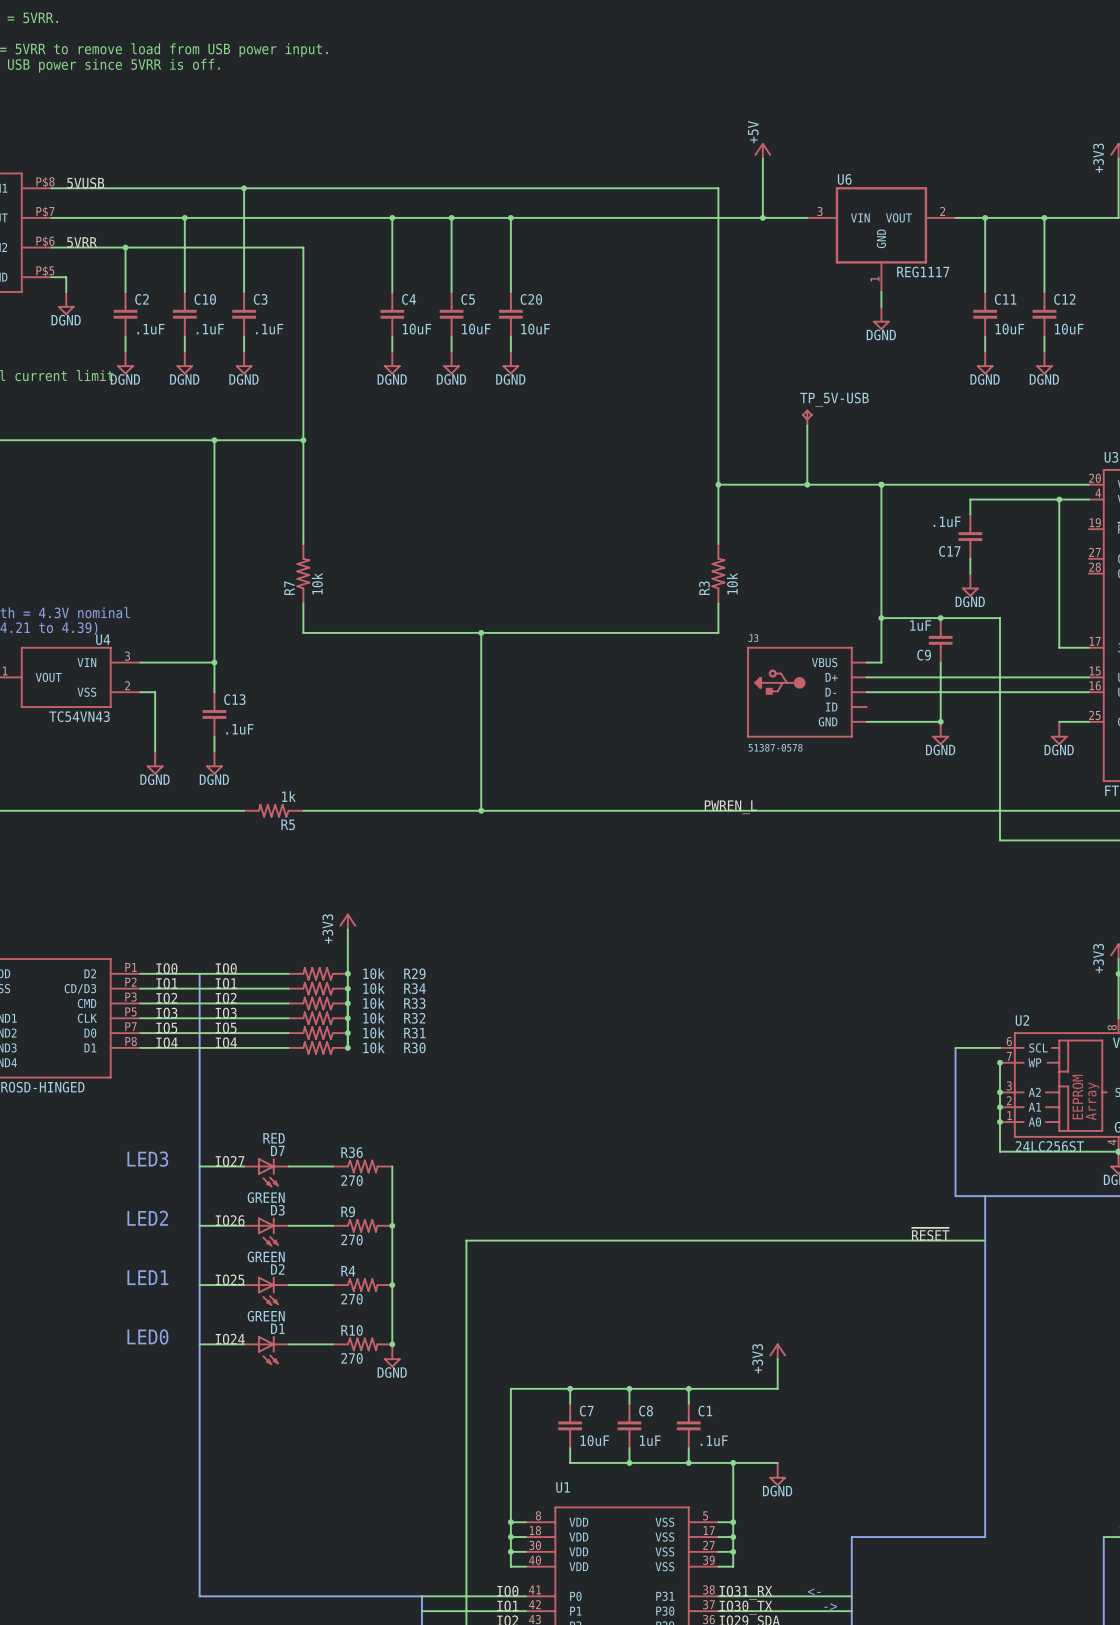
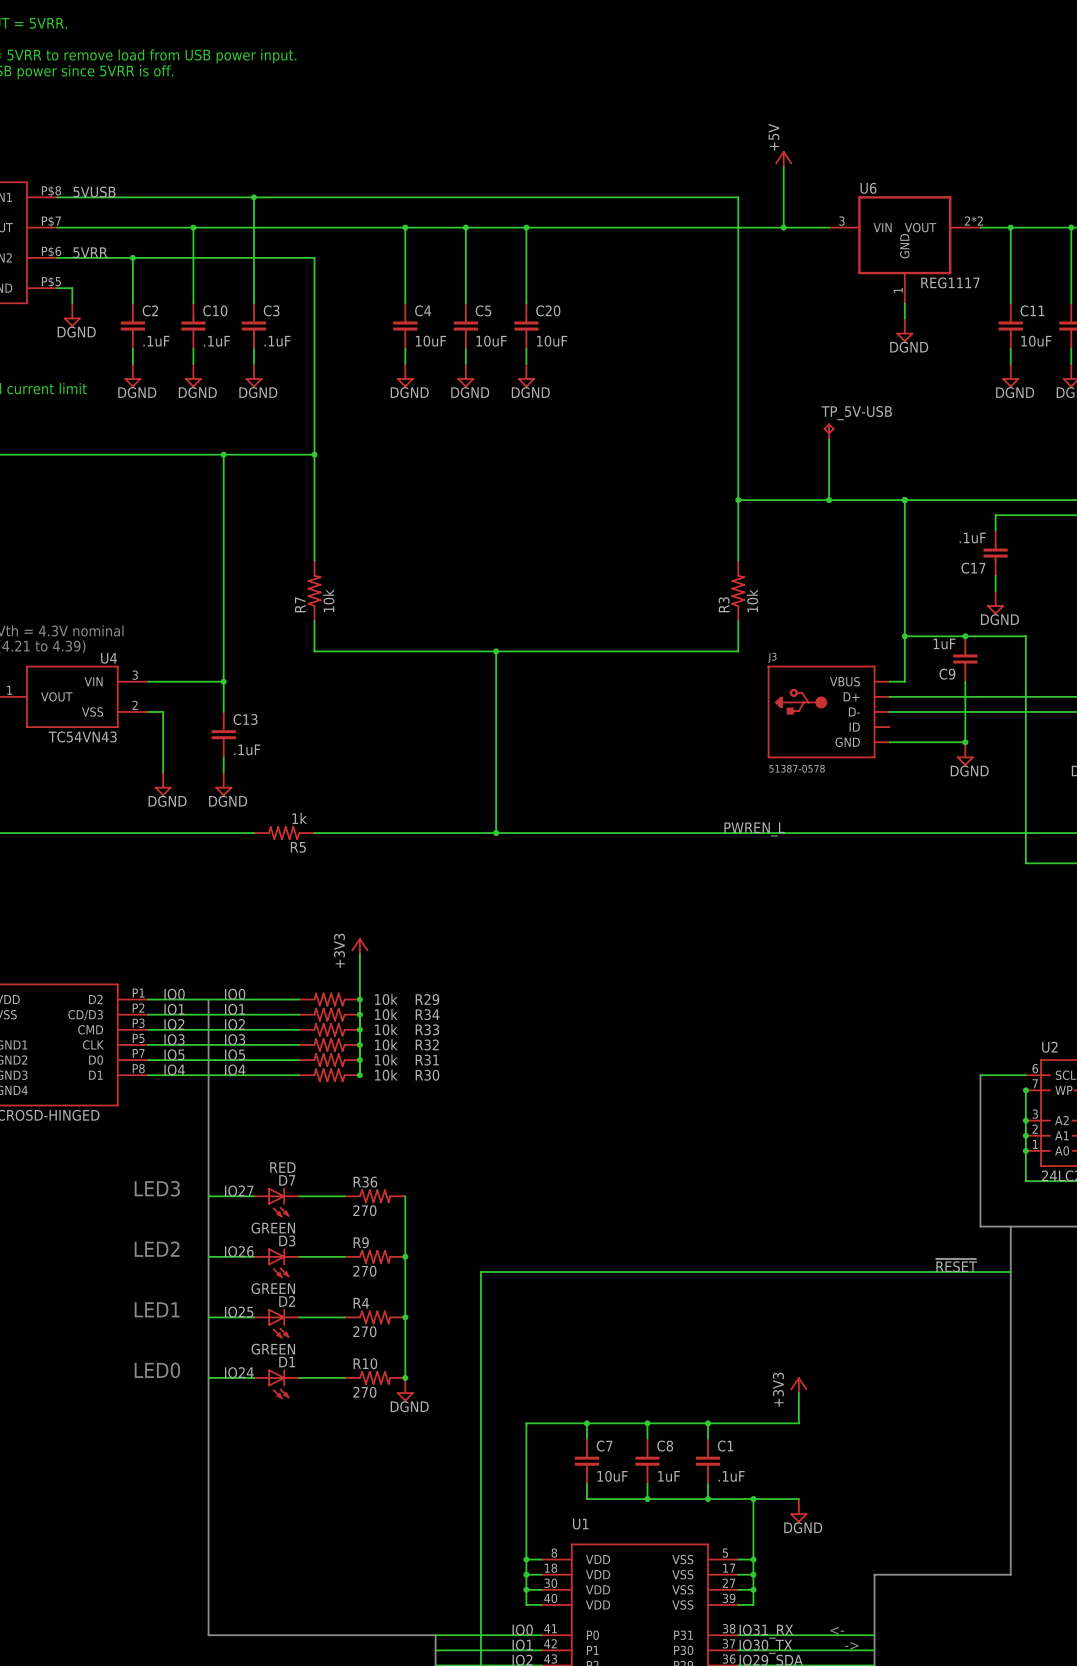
U6 pin number: 2 (942, 211) -> 2*2 (973, 221)

